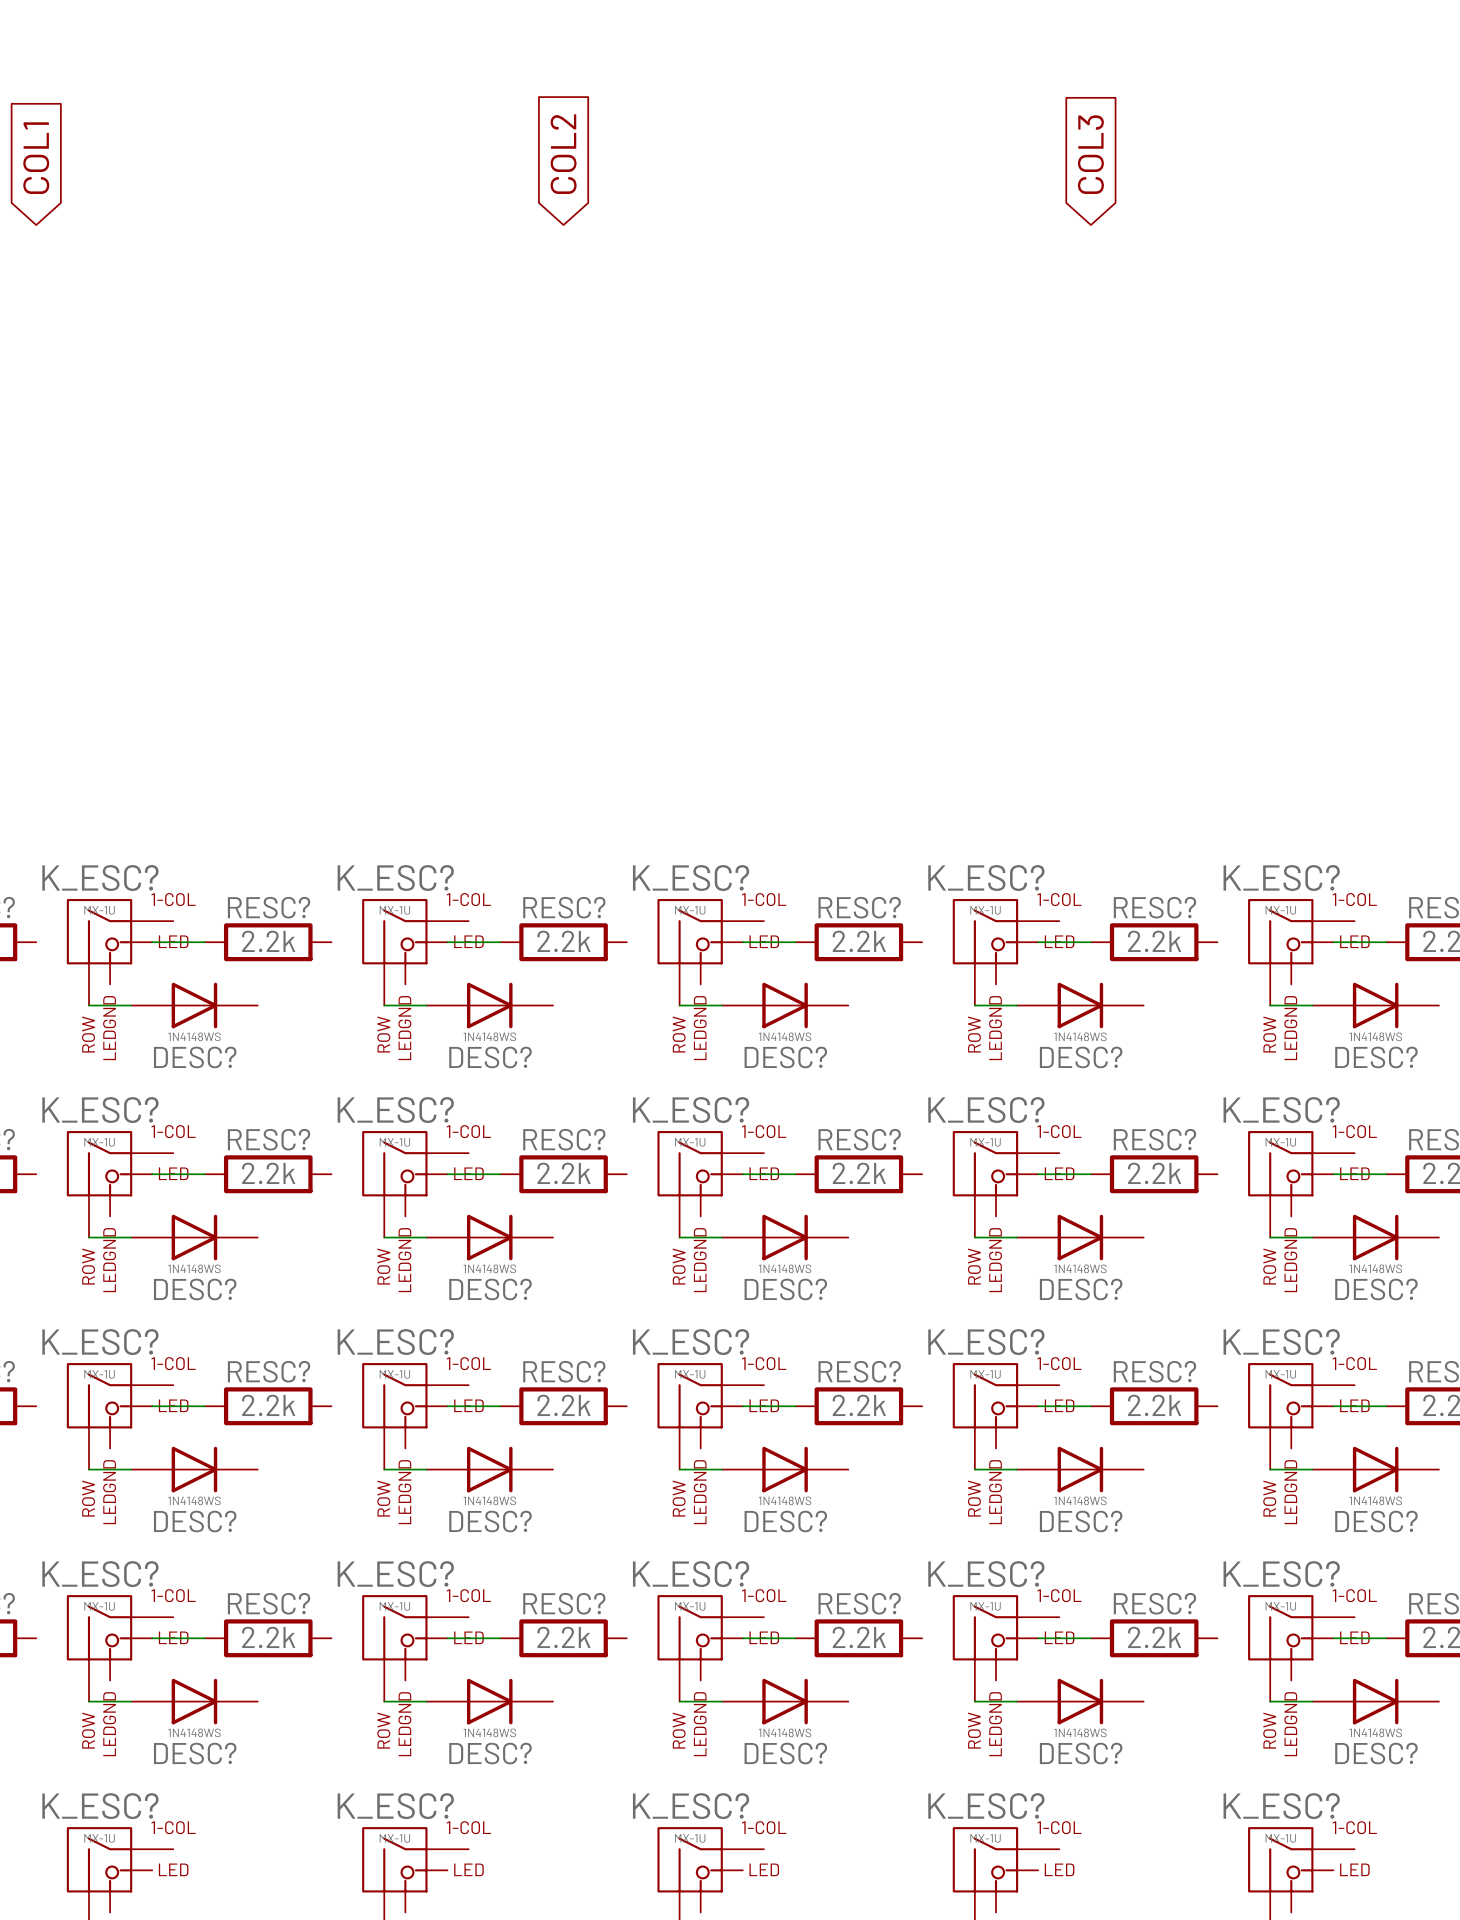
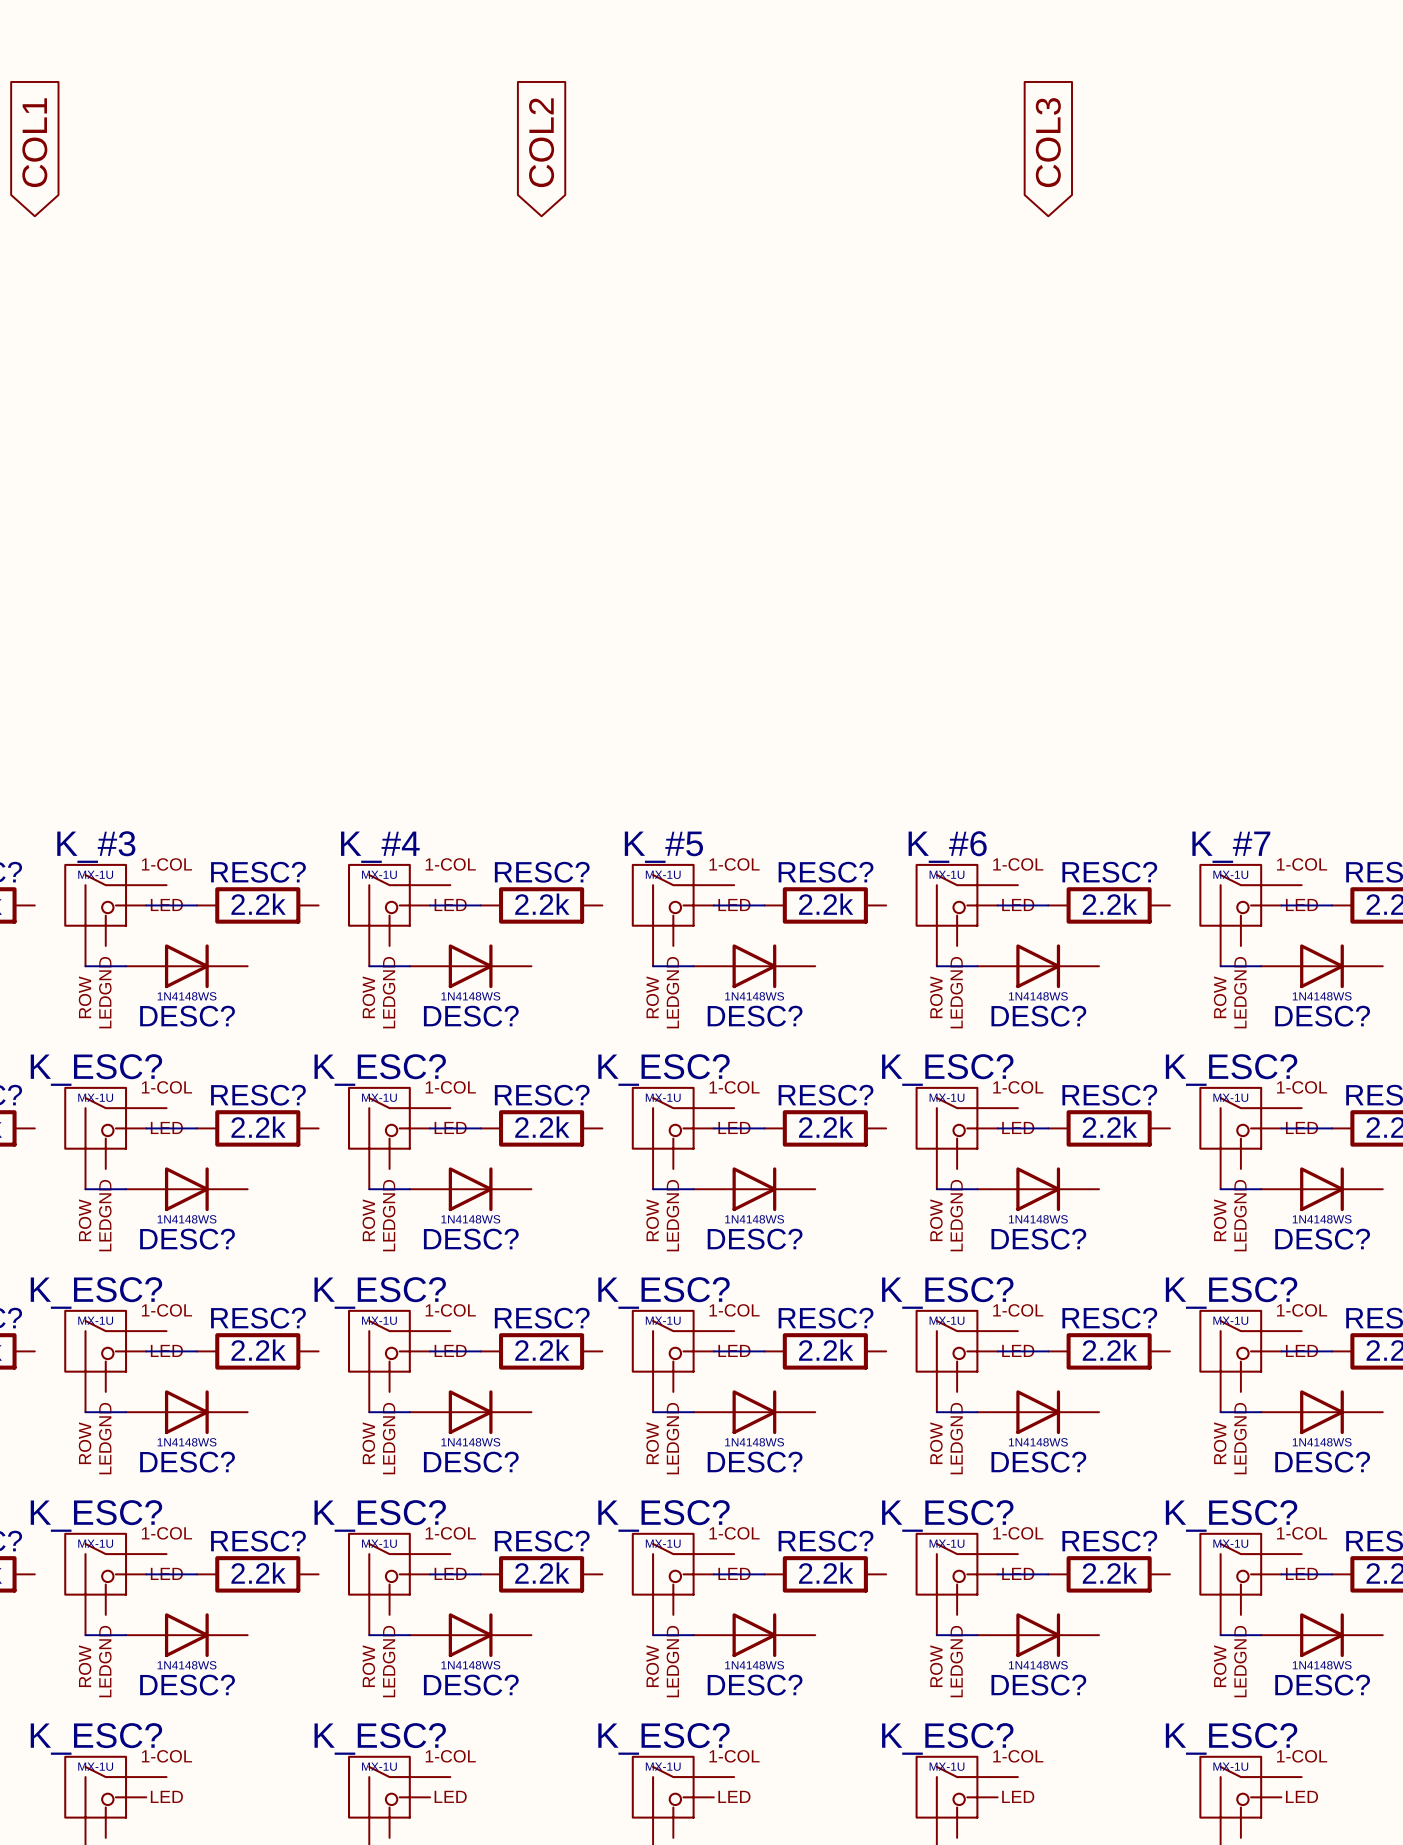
K_ESC? name: K_ESC? (100, 878) -> K_#3 (96, 847)
K_ESC? name: K_ESC? (395, 878) -> K_#4 (380, 847)
K_ESC? name: K_ESC? (691, 878) -> K_#5 (663, 847)
K_ESC? name: K_ESC? (986, 878) -> K_#6 (947, 847)
K_ESC? name: K_ESC? (1281, 878) -> K_#7 (1231, 847)

